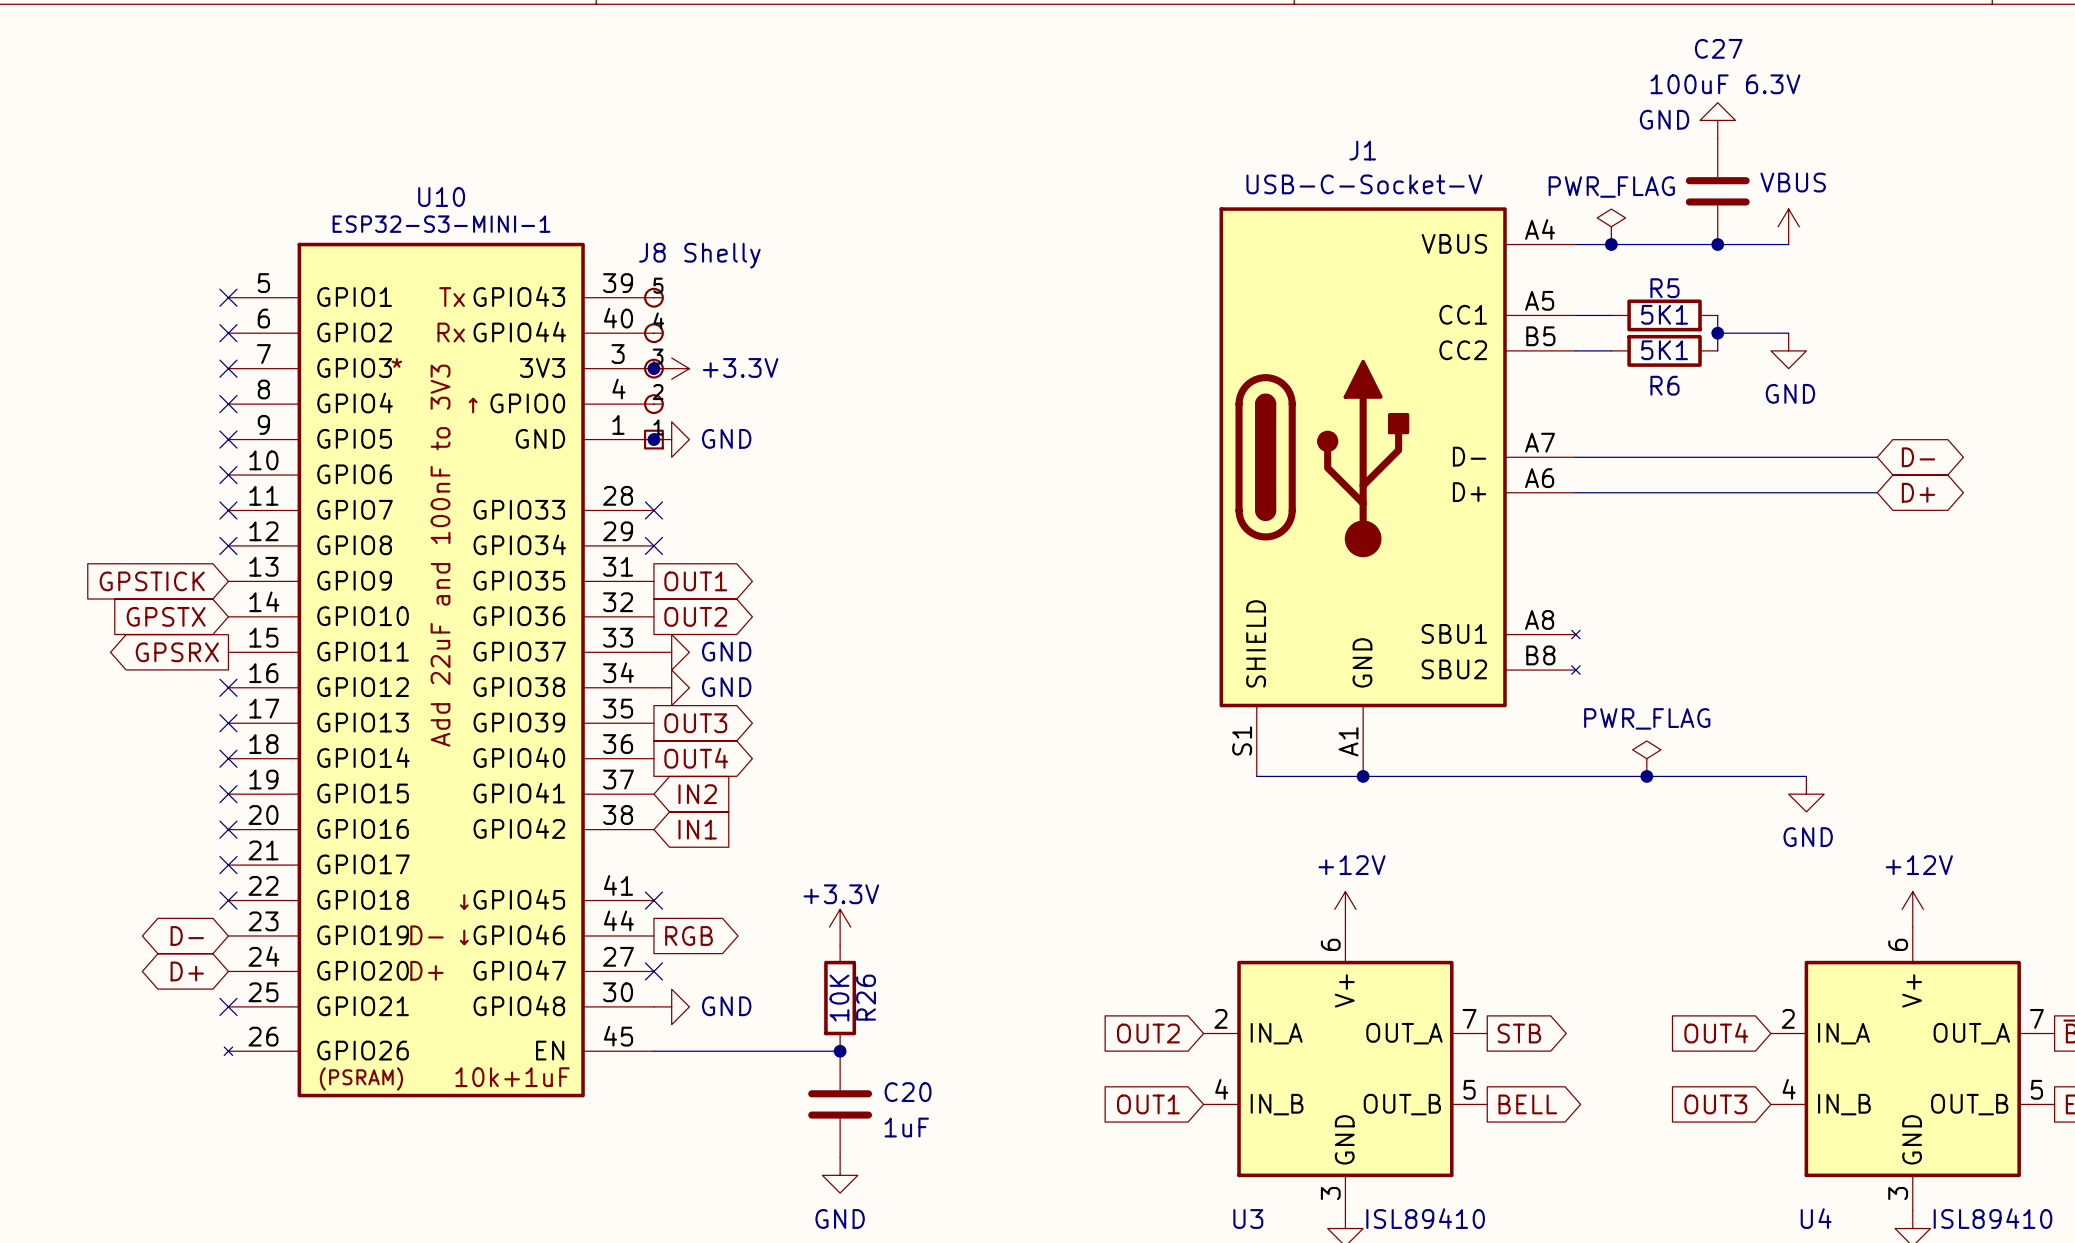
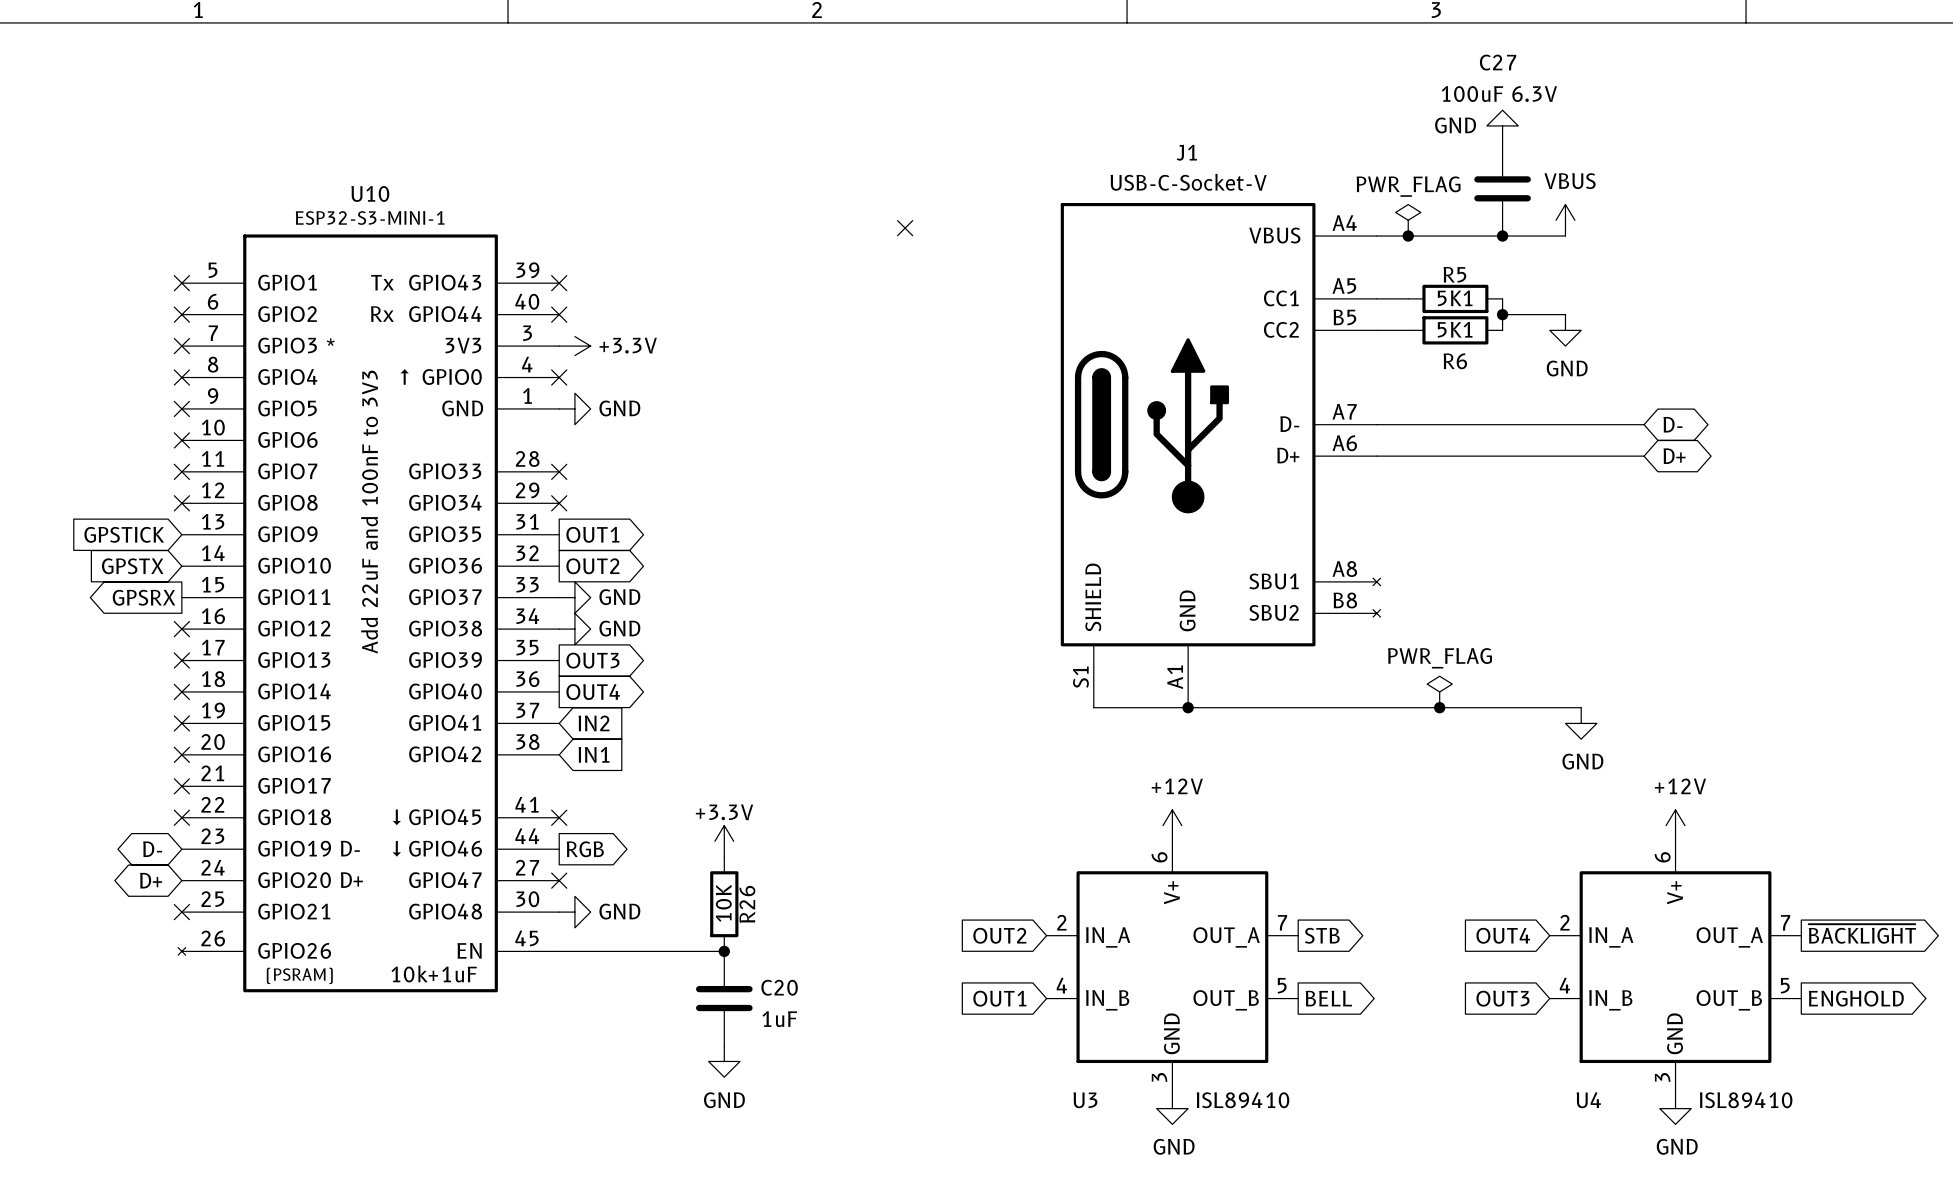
no-connect mark: none -> (905, 228)
no-connect mark: none -> (559, 283)
no-connect mark: none -> (559, 314)
junction: (653, 368) -> none
J8: Shelly (653, 368) -> none
no-connect mark: none -> (559, 377)
junction: (653, 439) -> none

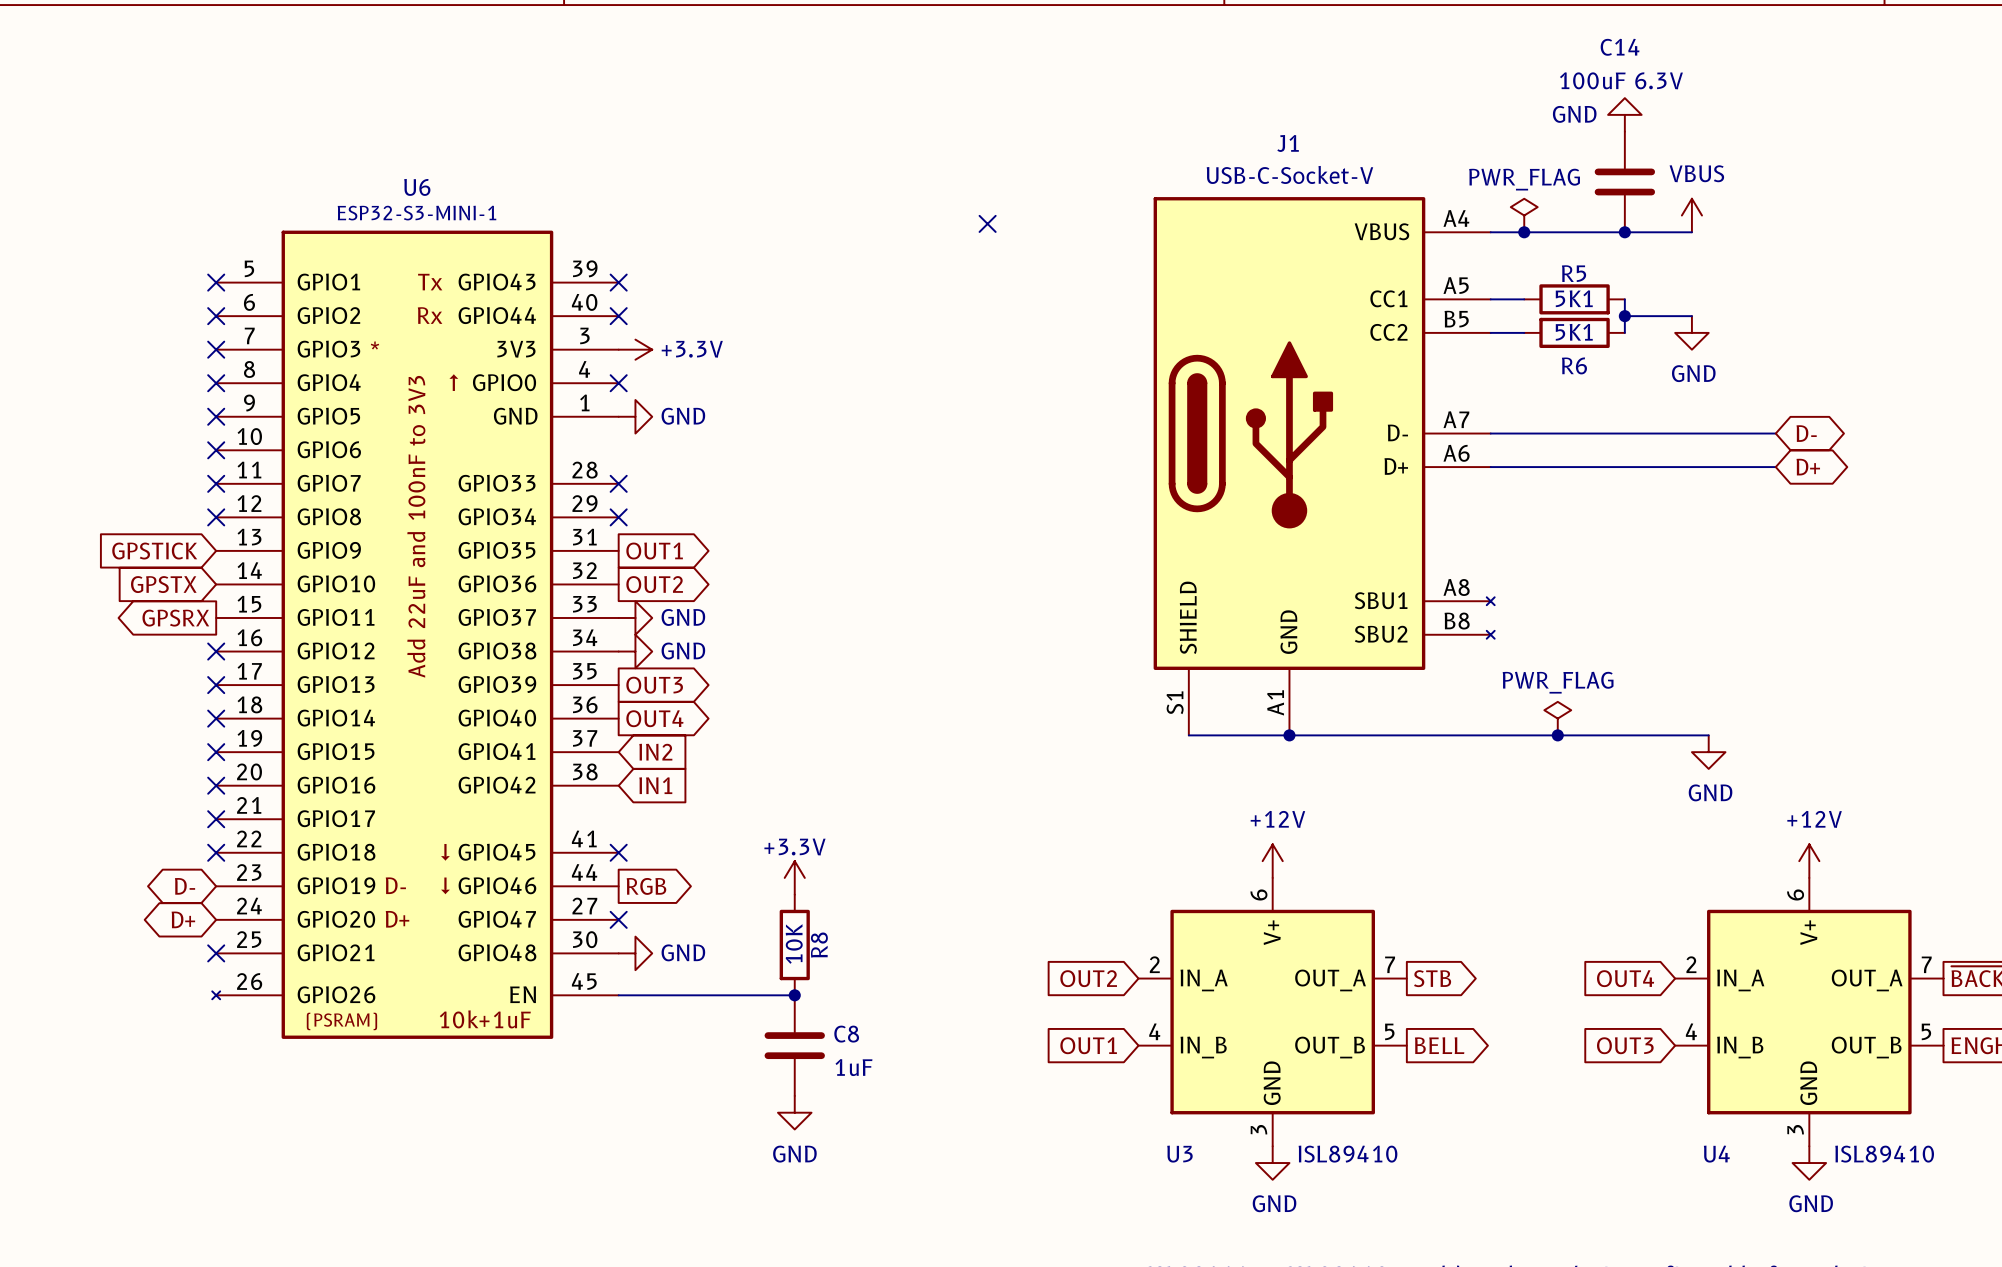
C27 name: C27 (1498, 62) -> C14 (1620, 47)
U10 name: U10 (370, 193) -> U6 (417, 187)
R26 name: R26 (747, 904) -> R8 (819, 945)
C20 name: C20 (779, 987) -> C8 (846, 1034)

